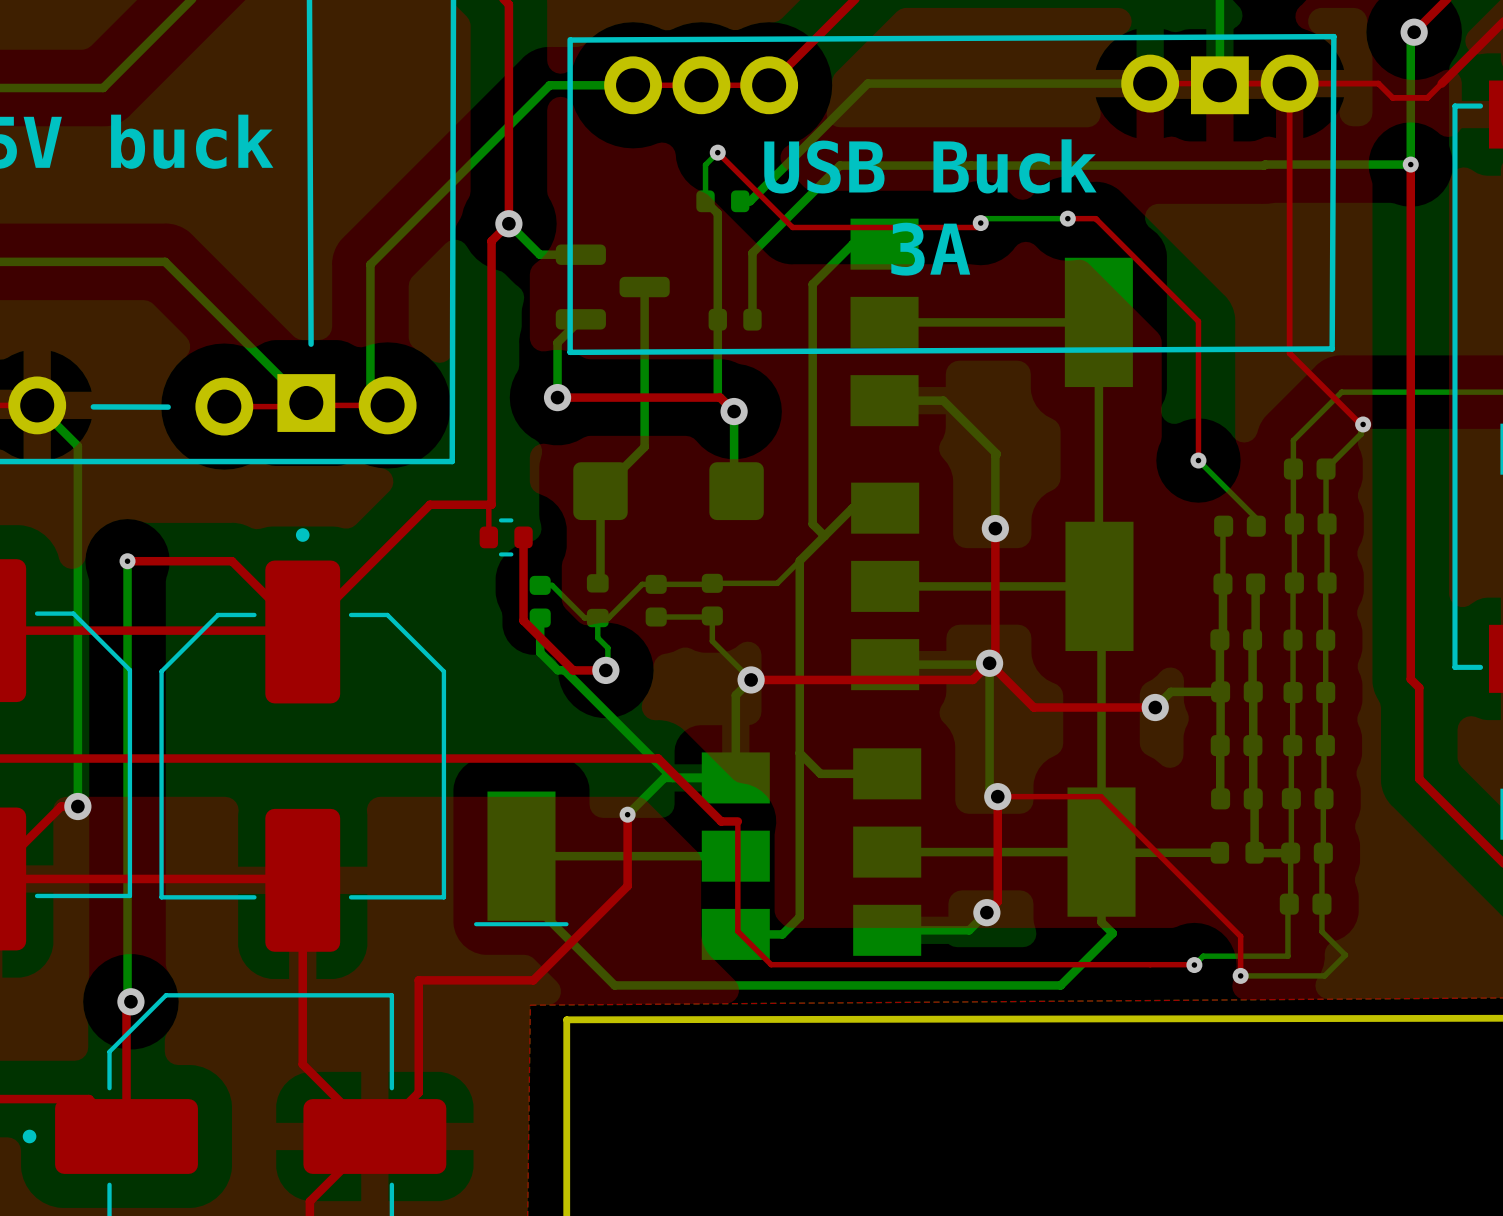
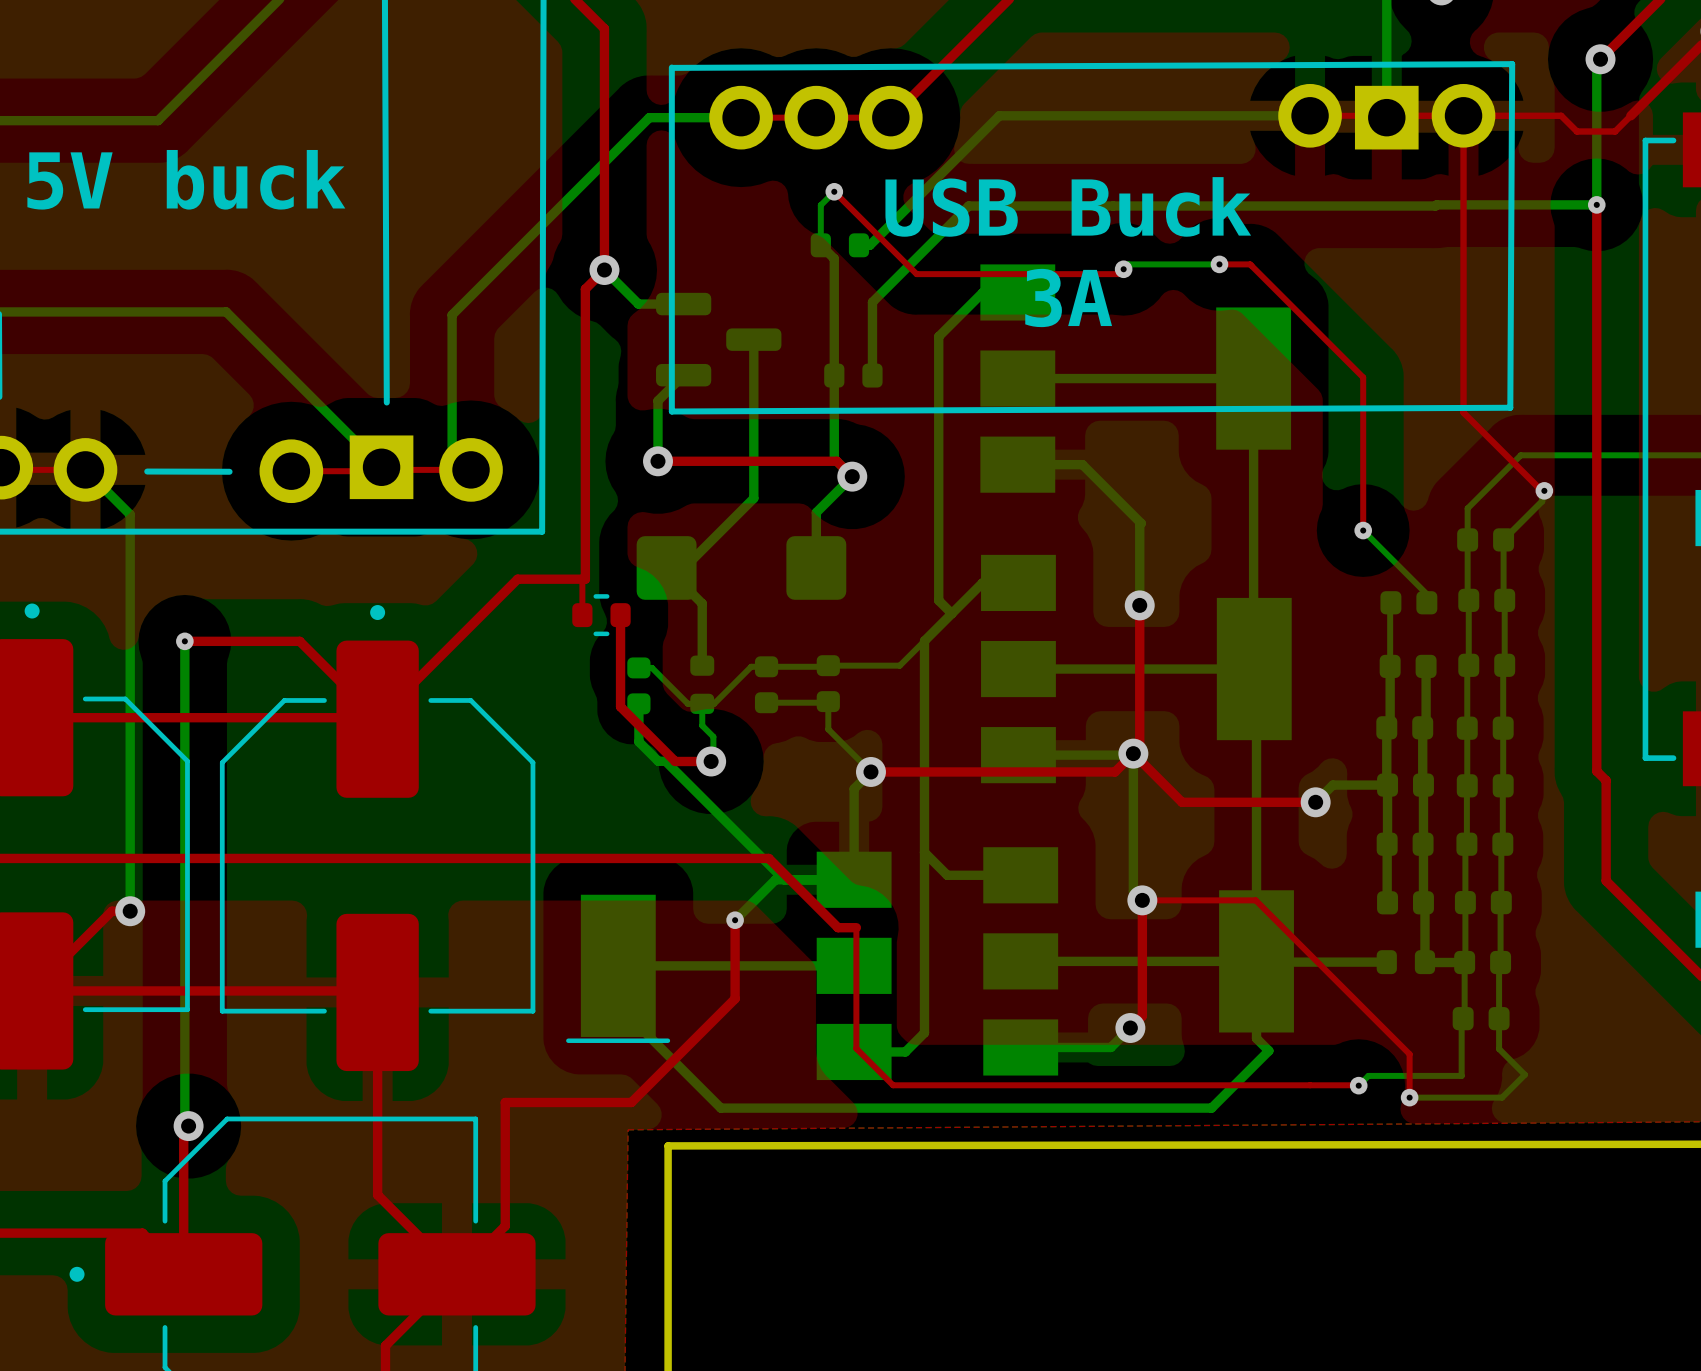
bottom track: (734, 411) (734, 488) (736, 491) -> none
bottom track: none -> (859, 483) (852, 476) (816, 512) (816, 567)
bottom track: (644, 431) (644, 447) (600, 491) (600, 580) (597, 583) -> (753, 498) (684, 567) (666, 567) (702, 603) (702, 665) (700, 663)
part position: (668, 491) -> (741, 567)

